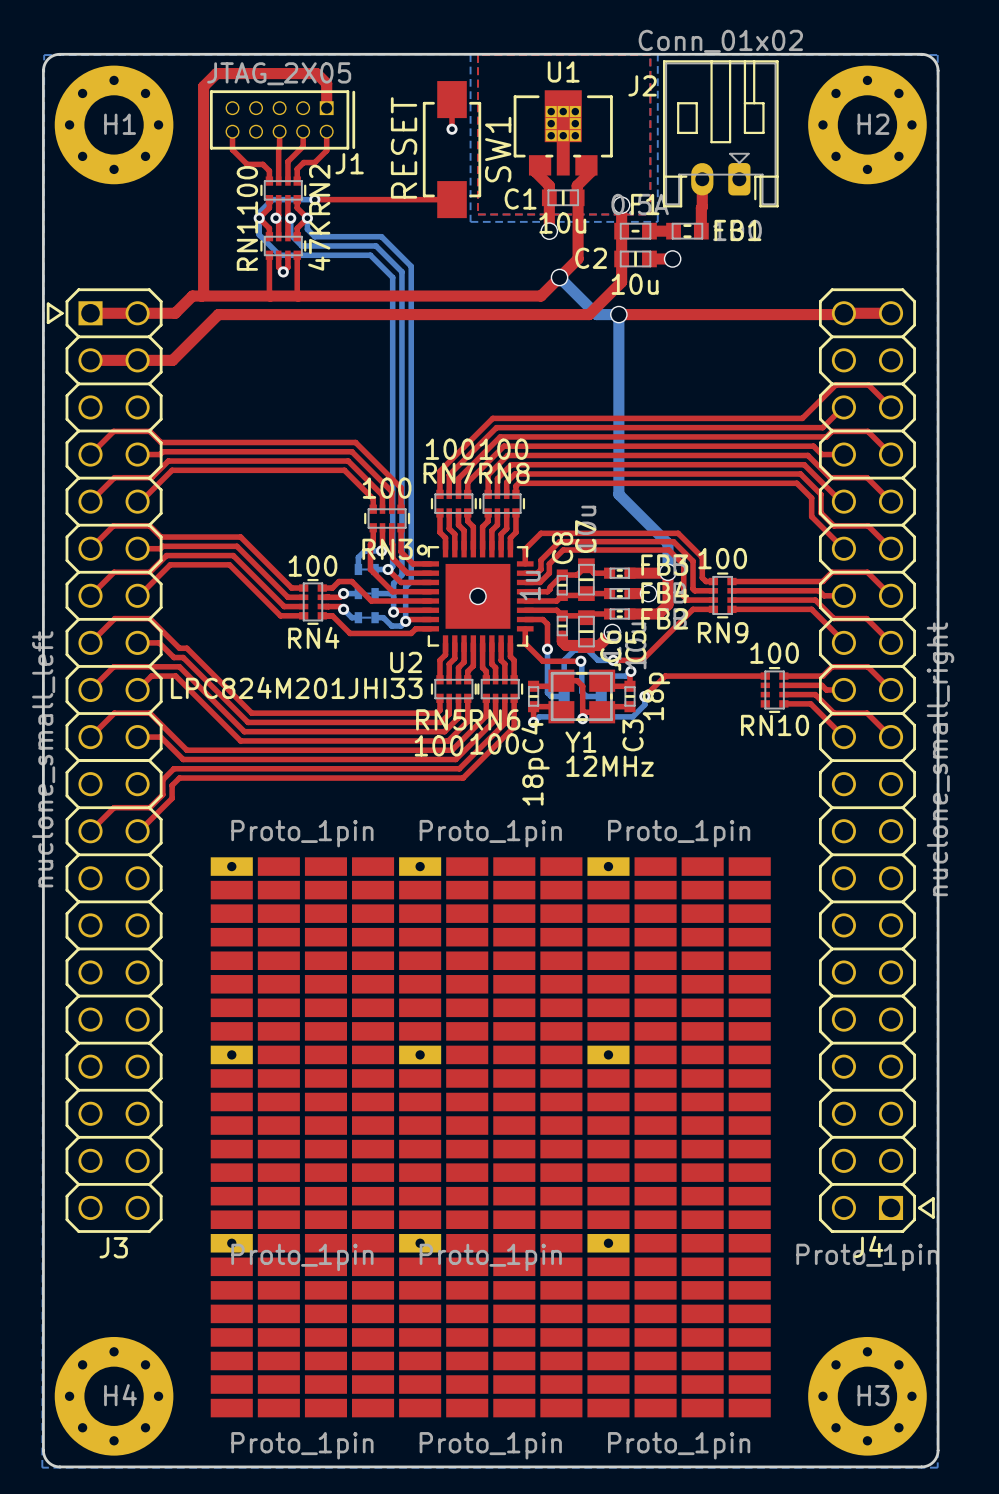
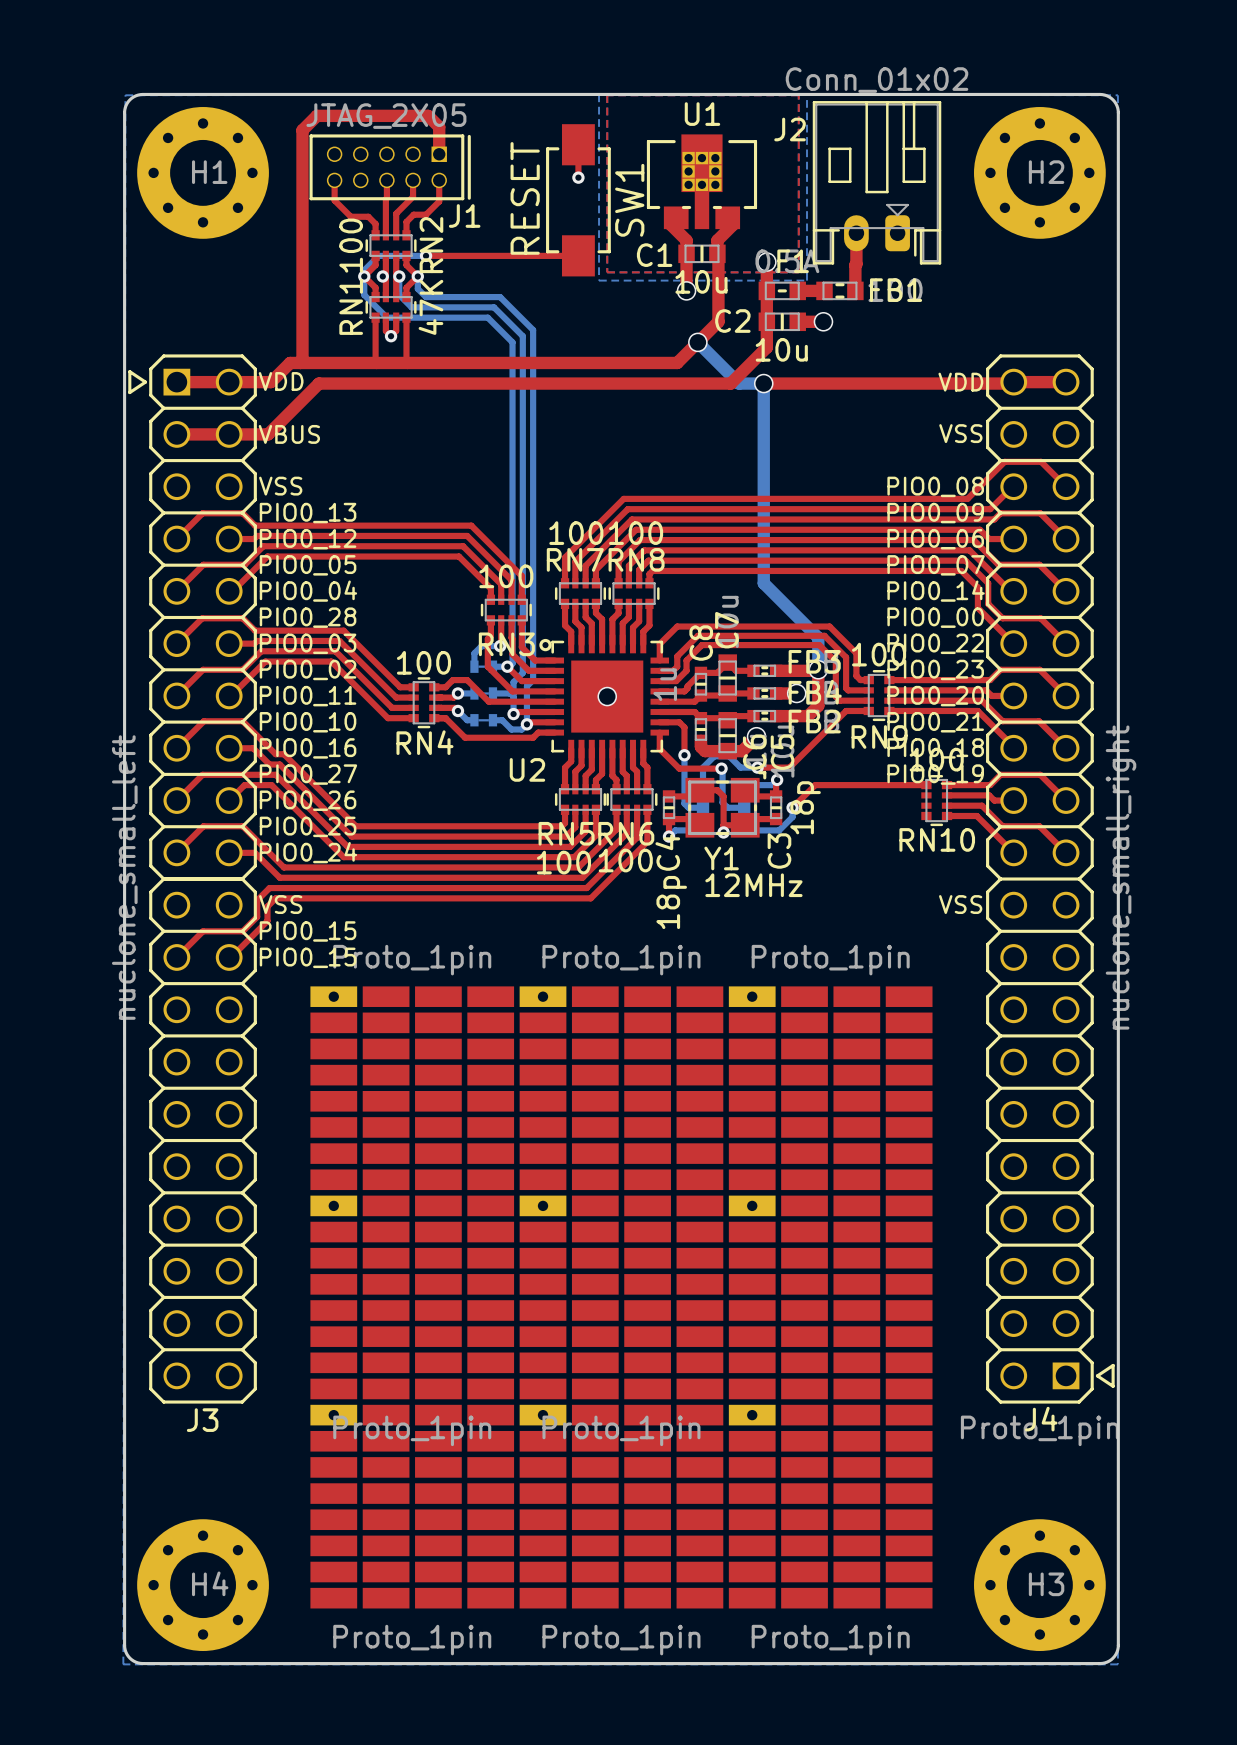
J3 footprint: [46, 288, 163, 1233] -> [128, 354, 257, 1404]
J4 footprint: [818, 288, 935, 1233] -> [986, 354, 1115, 1404]
U2 value: LPC824M201JHI33 (296, 687) -> none

